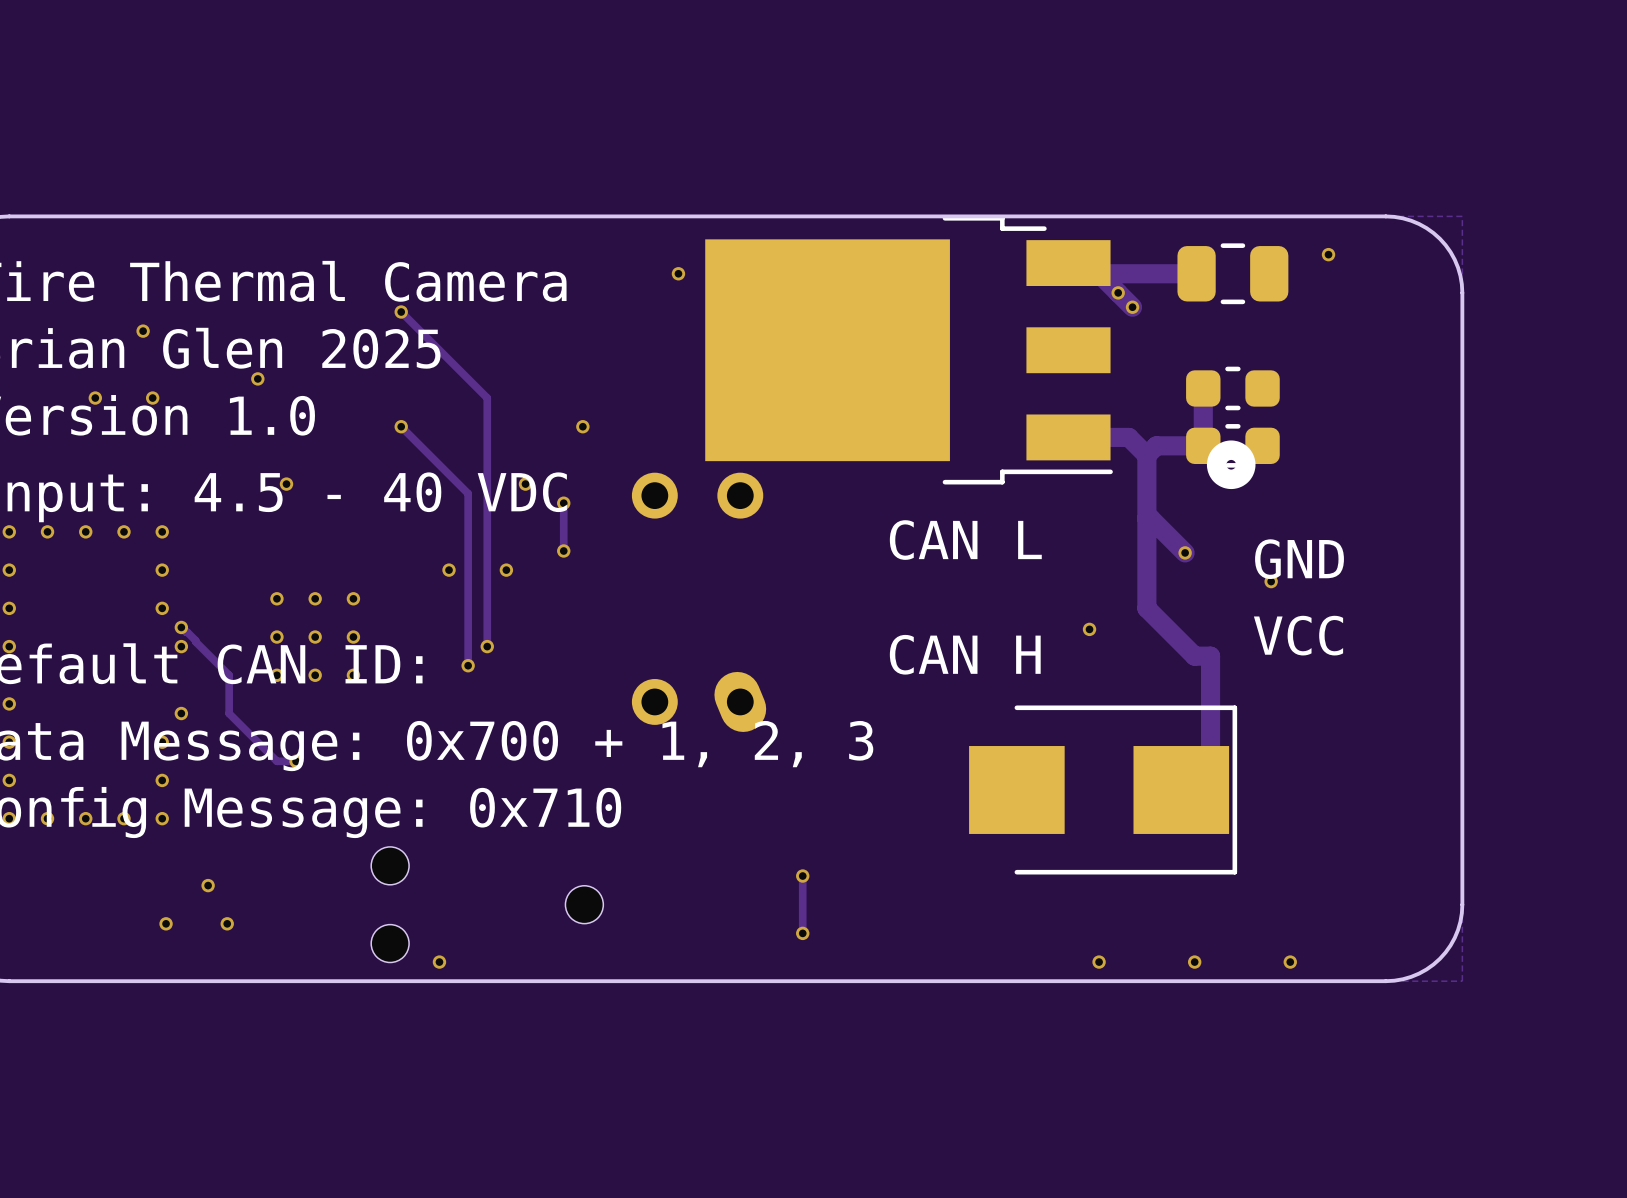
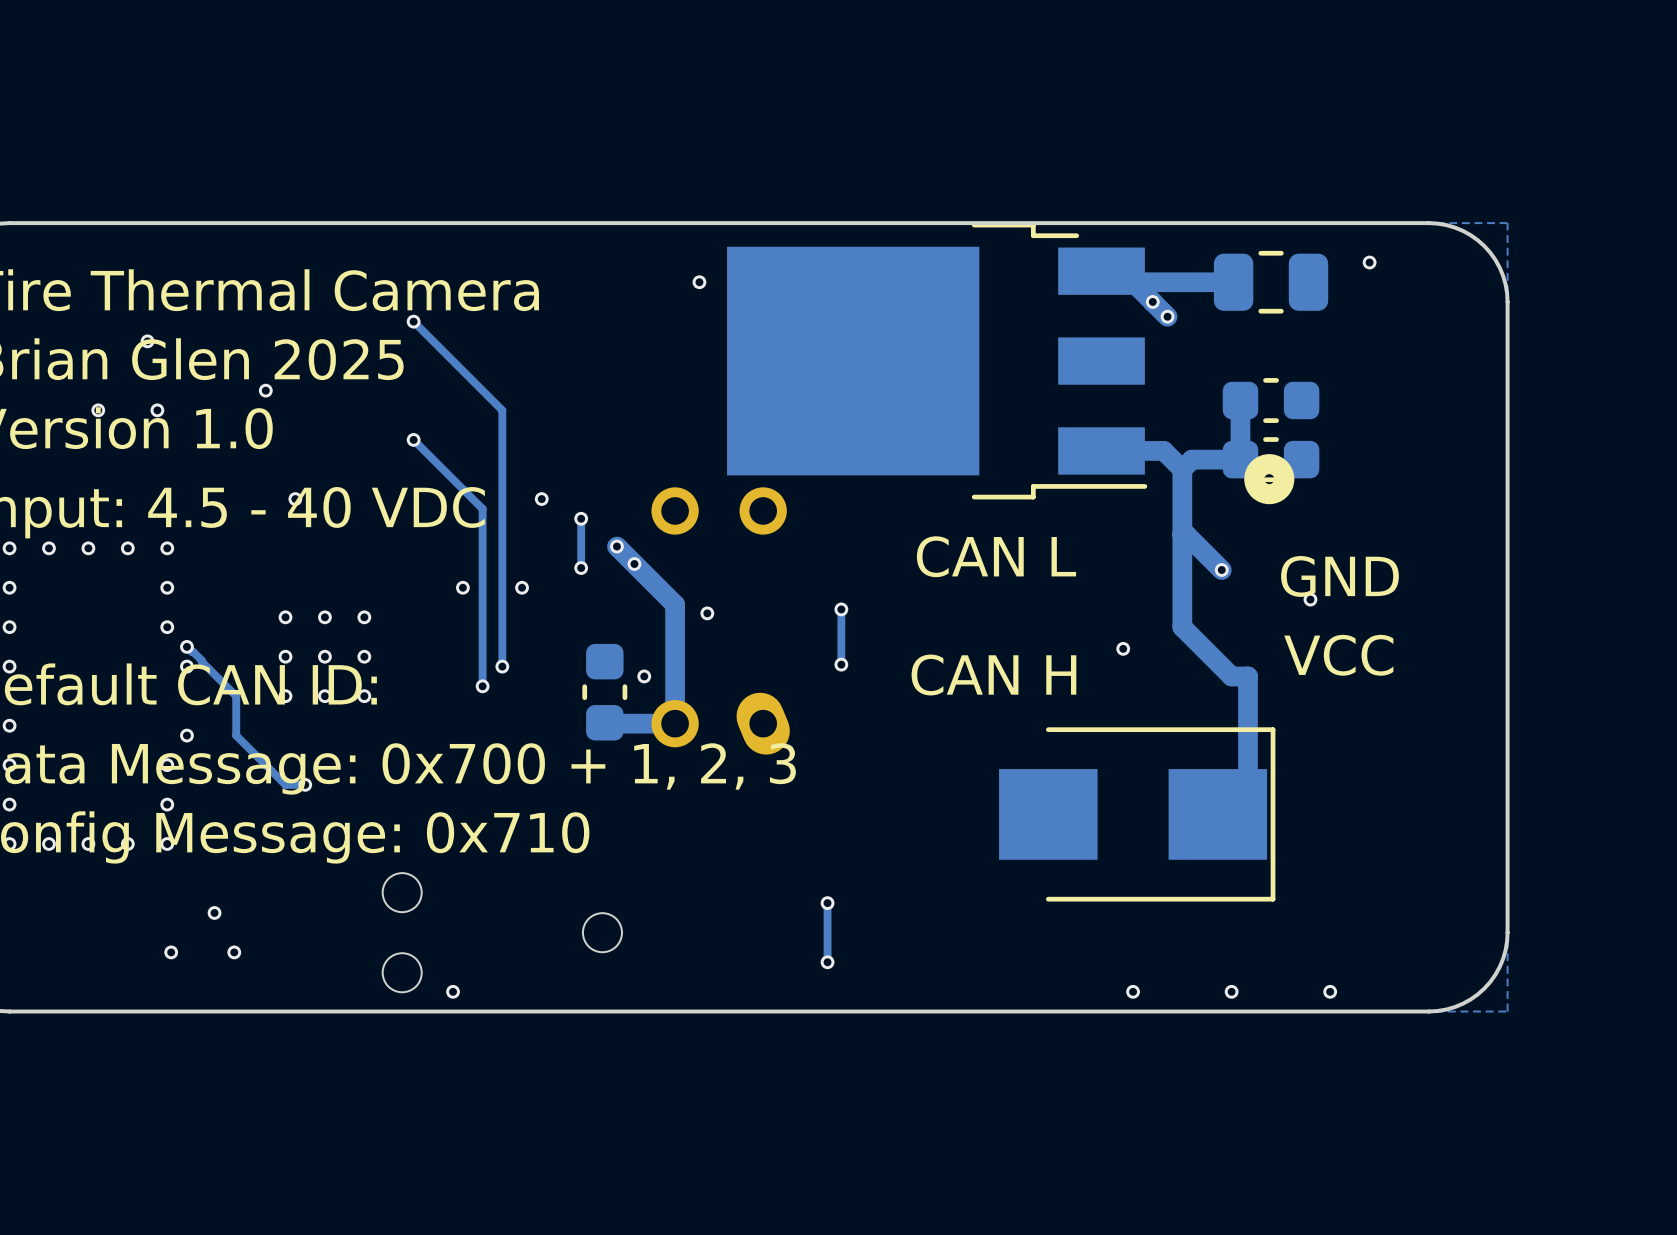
via: (582, 426) -> none
track: none -> (616, 546) (675, 604) (675, 723) (604, 722)
via: none -> (616, 546)
via: none -> (634, 564)
track: none -> (841, 609) (841, 664)
via: none -> (841, 609)
via: none -> (707, 613)
via: none -> (841, 664)
via: none -> (644, 676)
part: none -> (604, 692)

